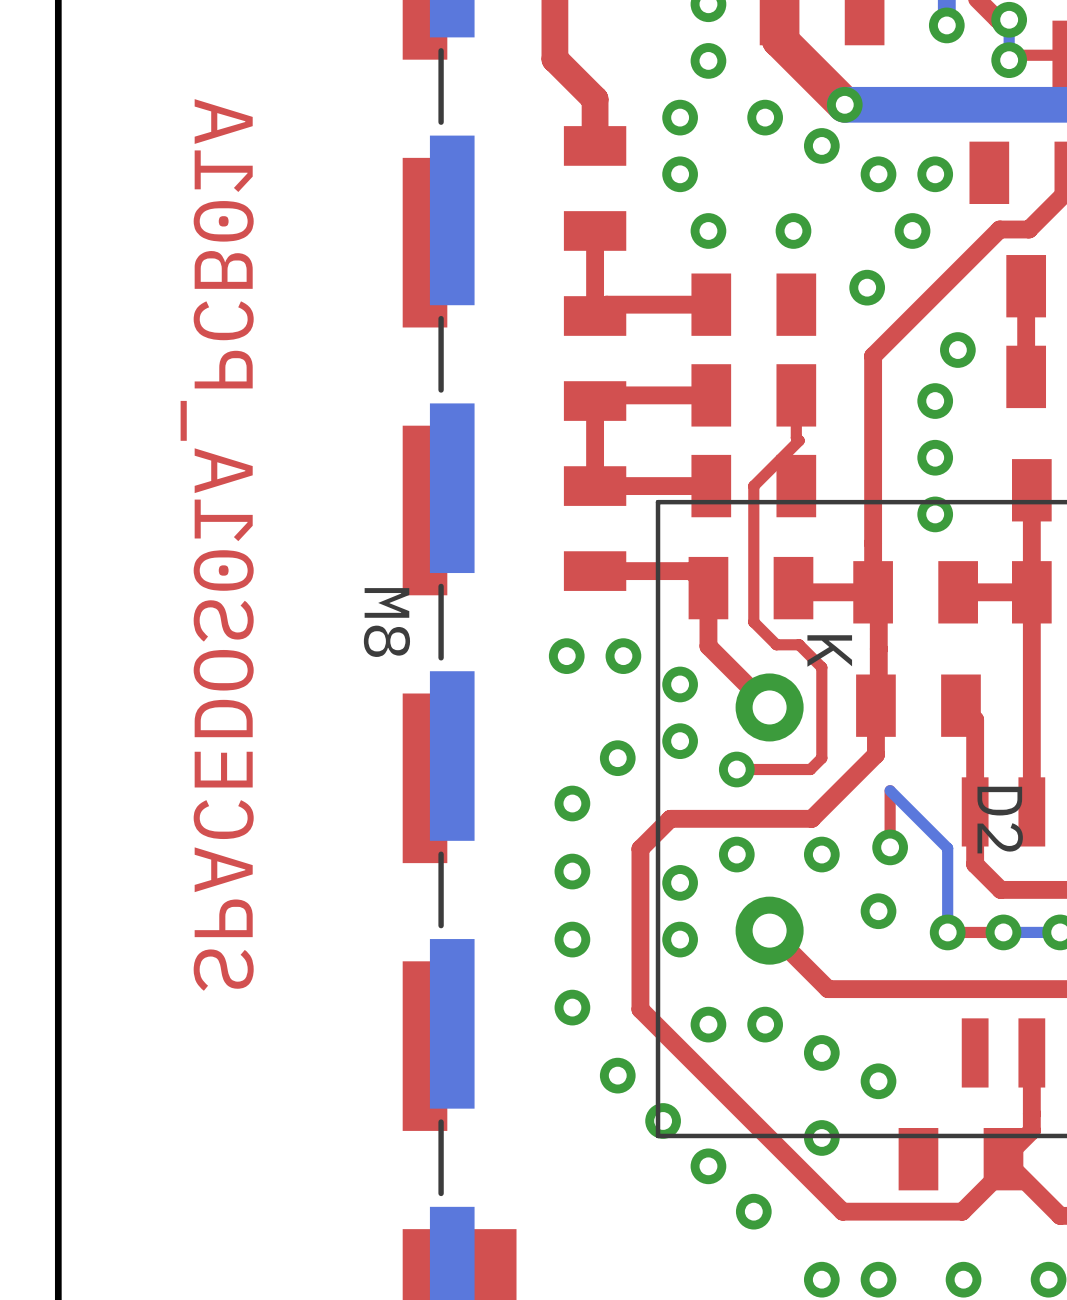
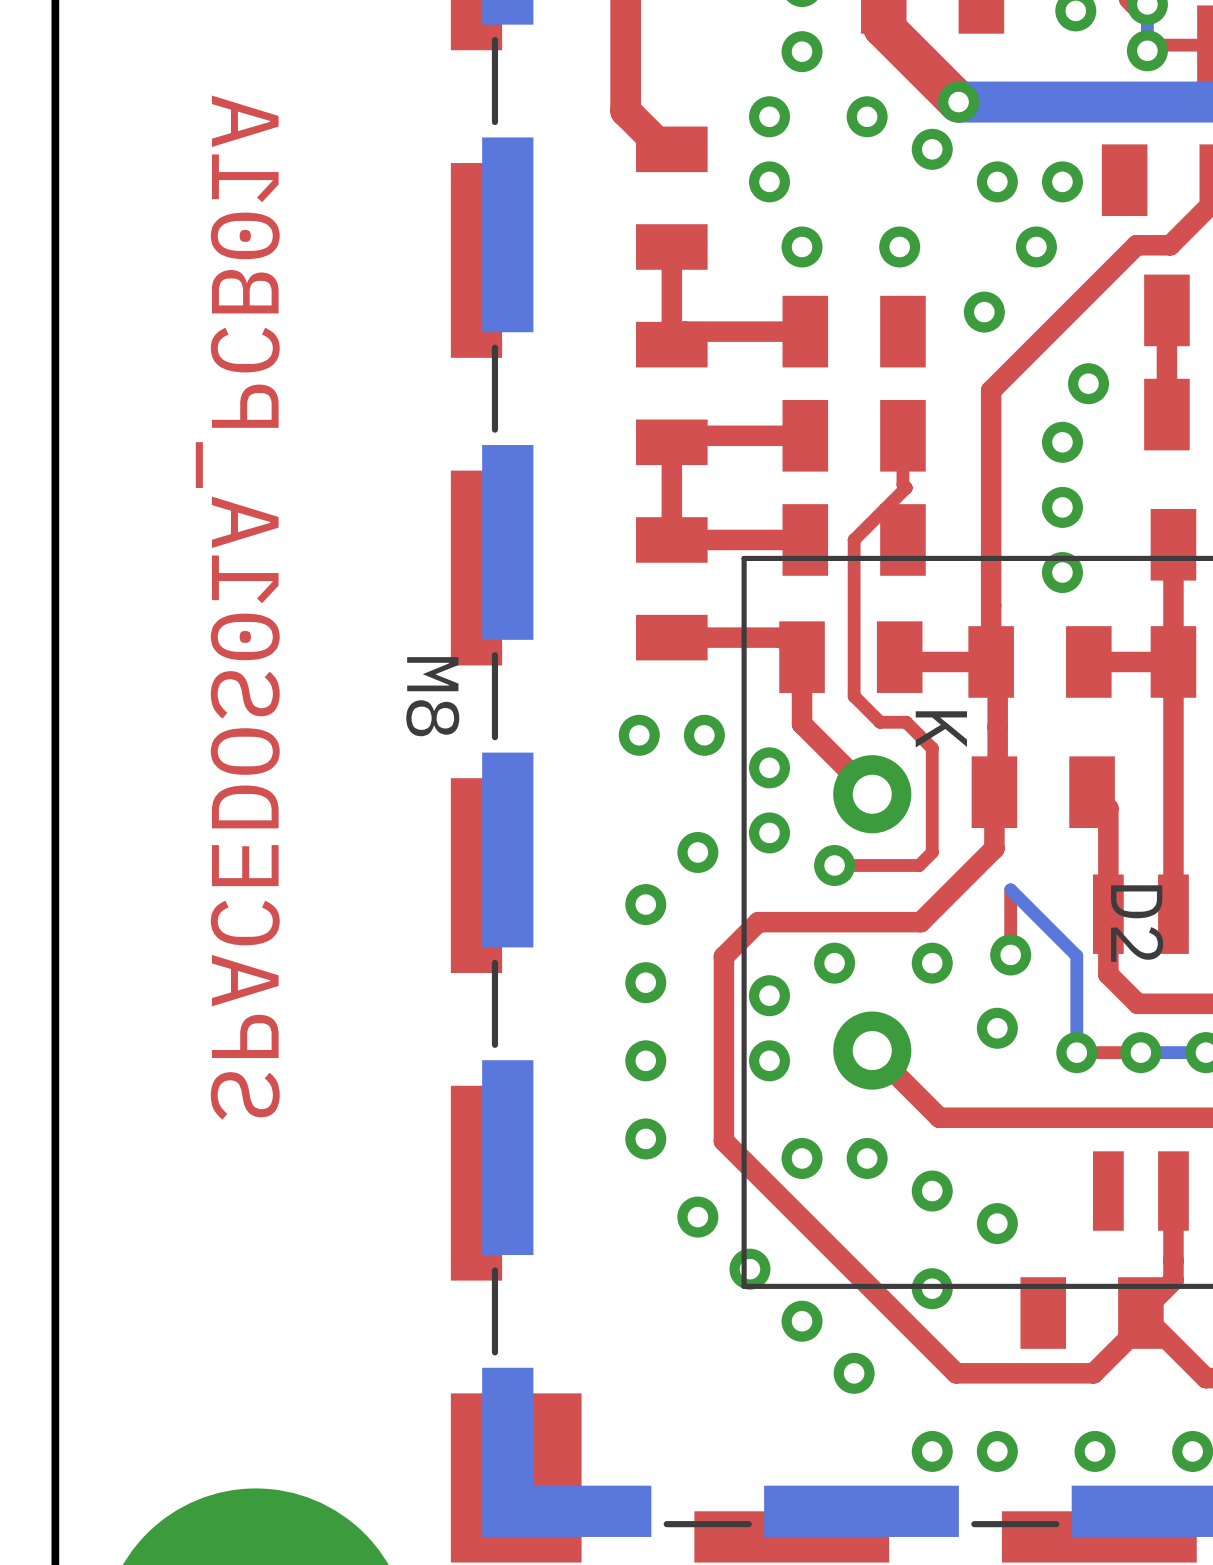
top track: (554, 59) (595, 99) (595, 145) -> (625, 49) (625, 111) (664, 149) (671, 149)

